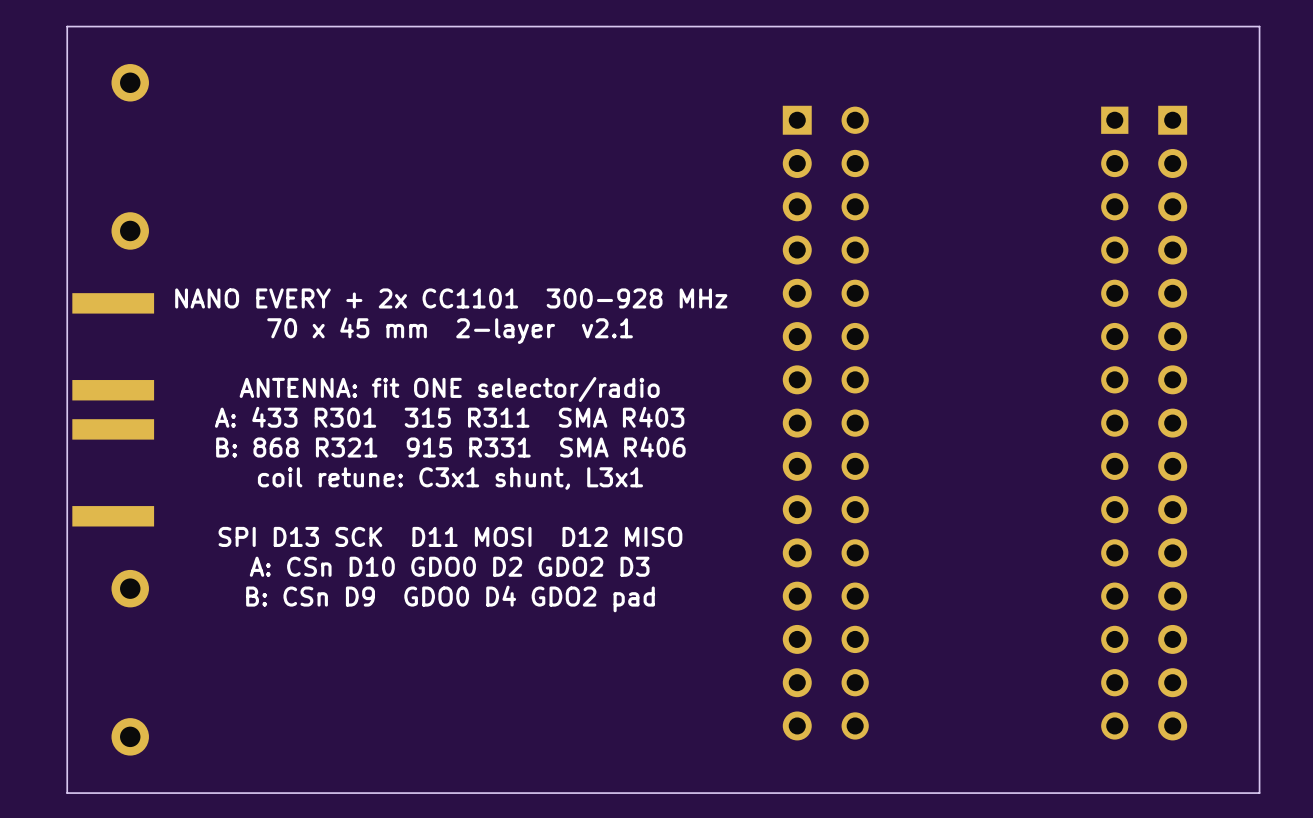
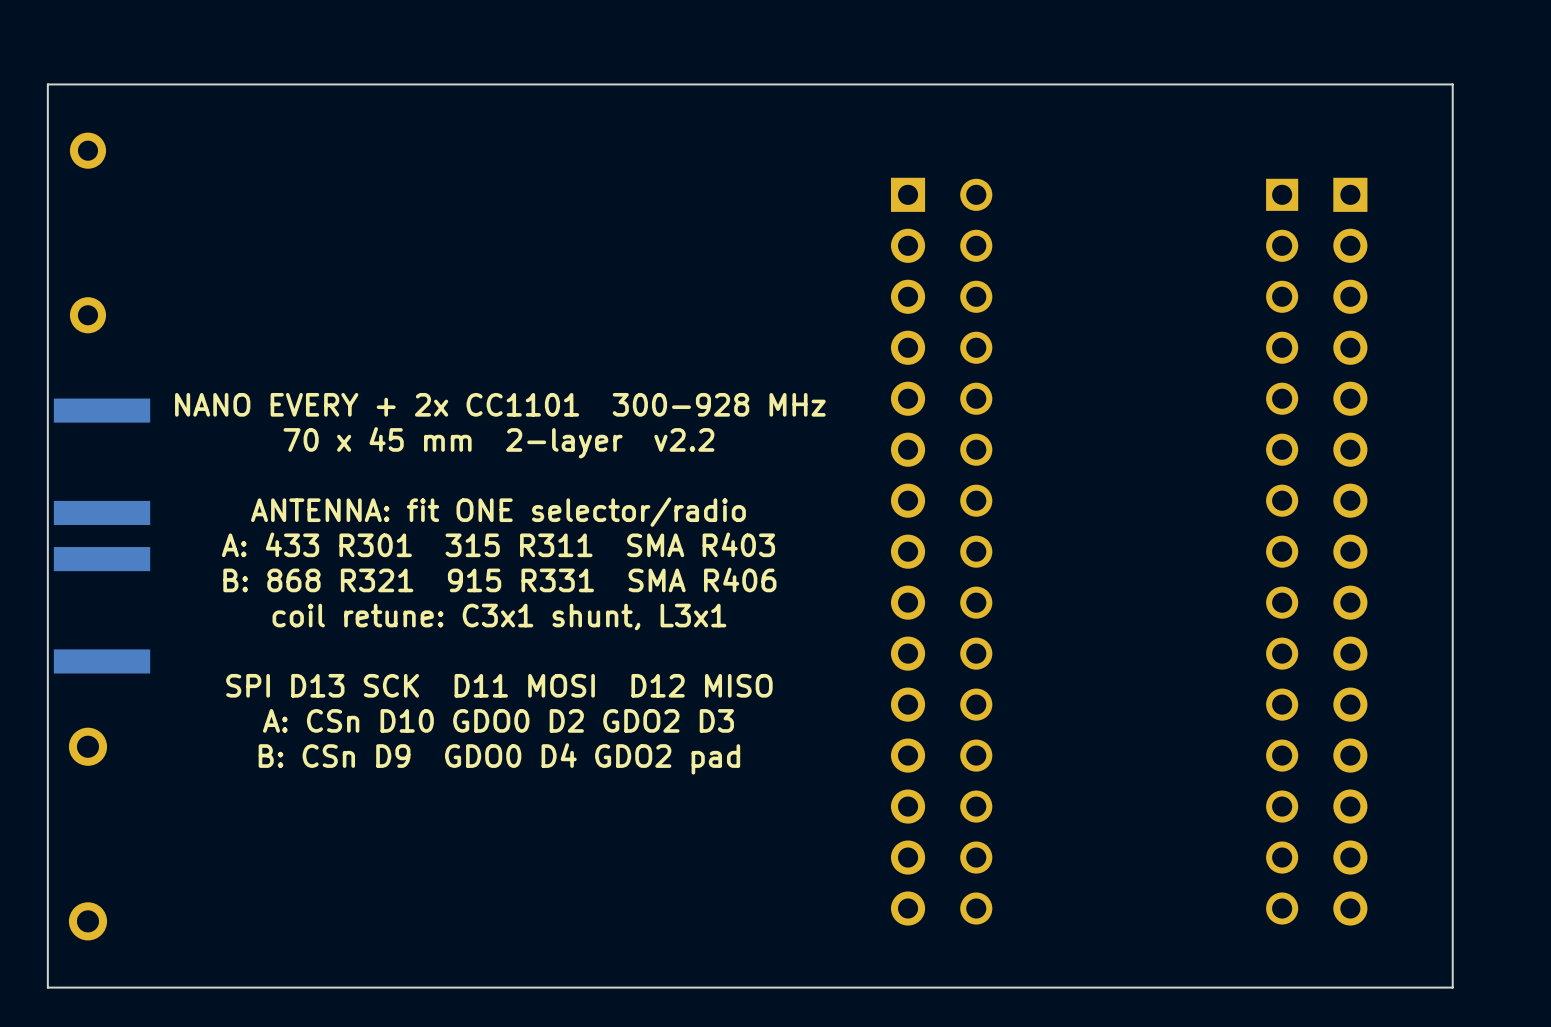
part: none -> (87, 150)
part: (130, 82) -> none
part: none -> (87, 315)
part: (130, 230) -> none
text: 70 x 45 mm 2-layer v2.1 (450, 330) -> 70 x 45 mm 2-layer v2.2 (498, 442)
part: none -> (87, 746)
part: (130, 588) -> none
part: none -> (87, 921)
part: (130, 736) -> none

